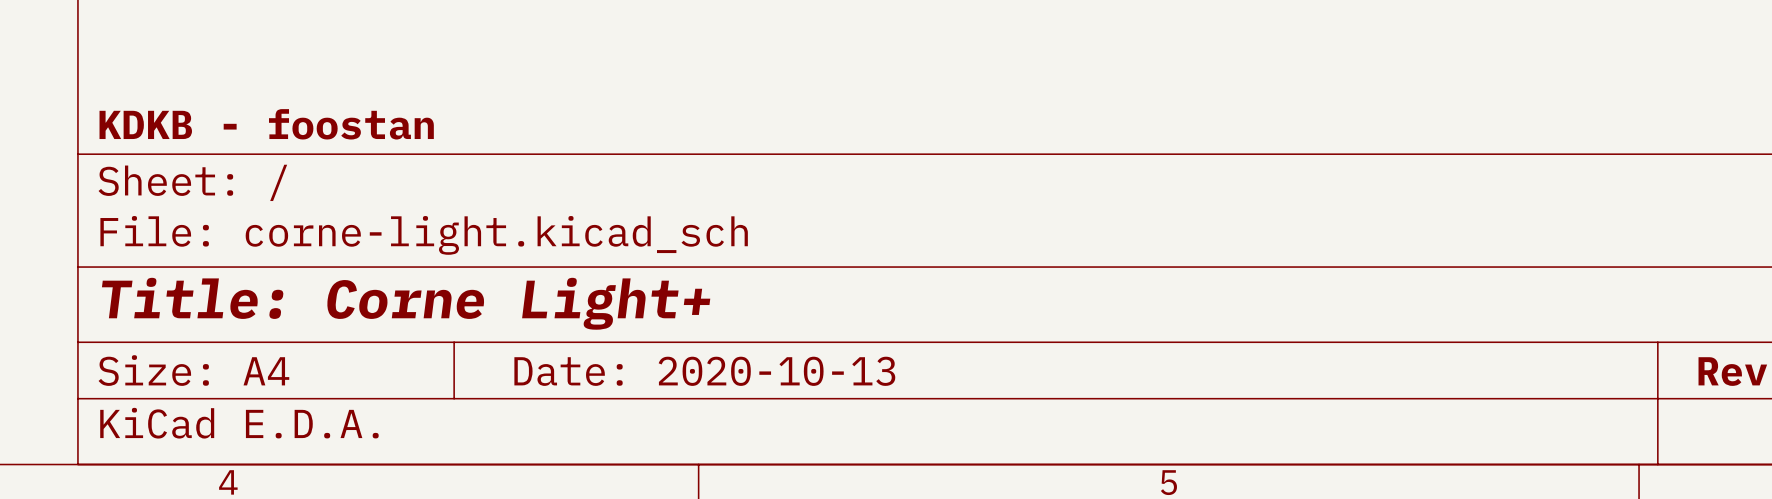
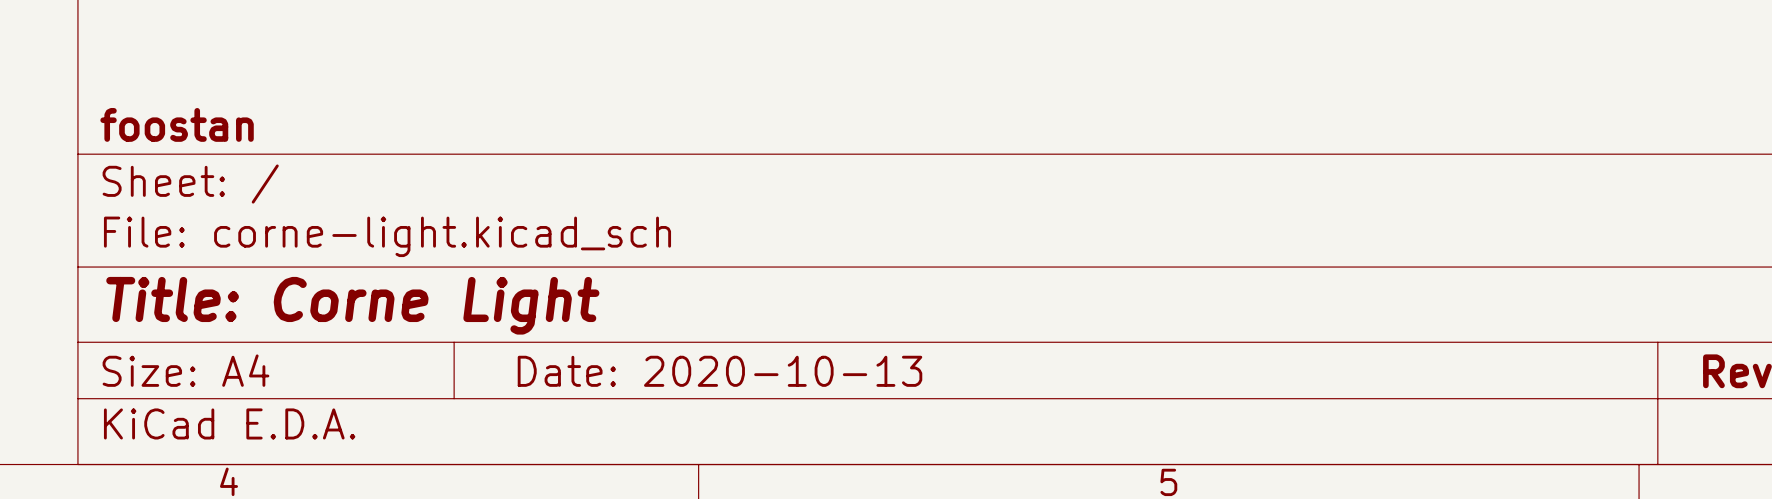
title block: KDKB - foostan (266, 124) -> foostan (177, 124)
title block: Title: Corne Light+ (406, 303) -> Title: Corne Light (352, 305)

